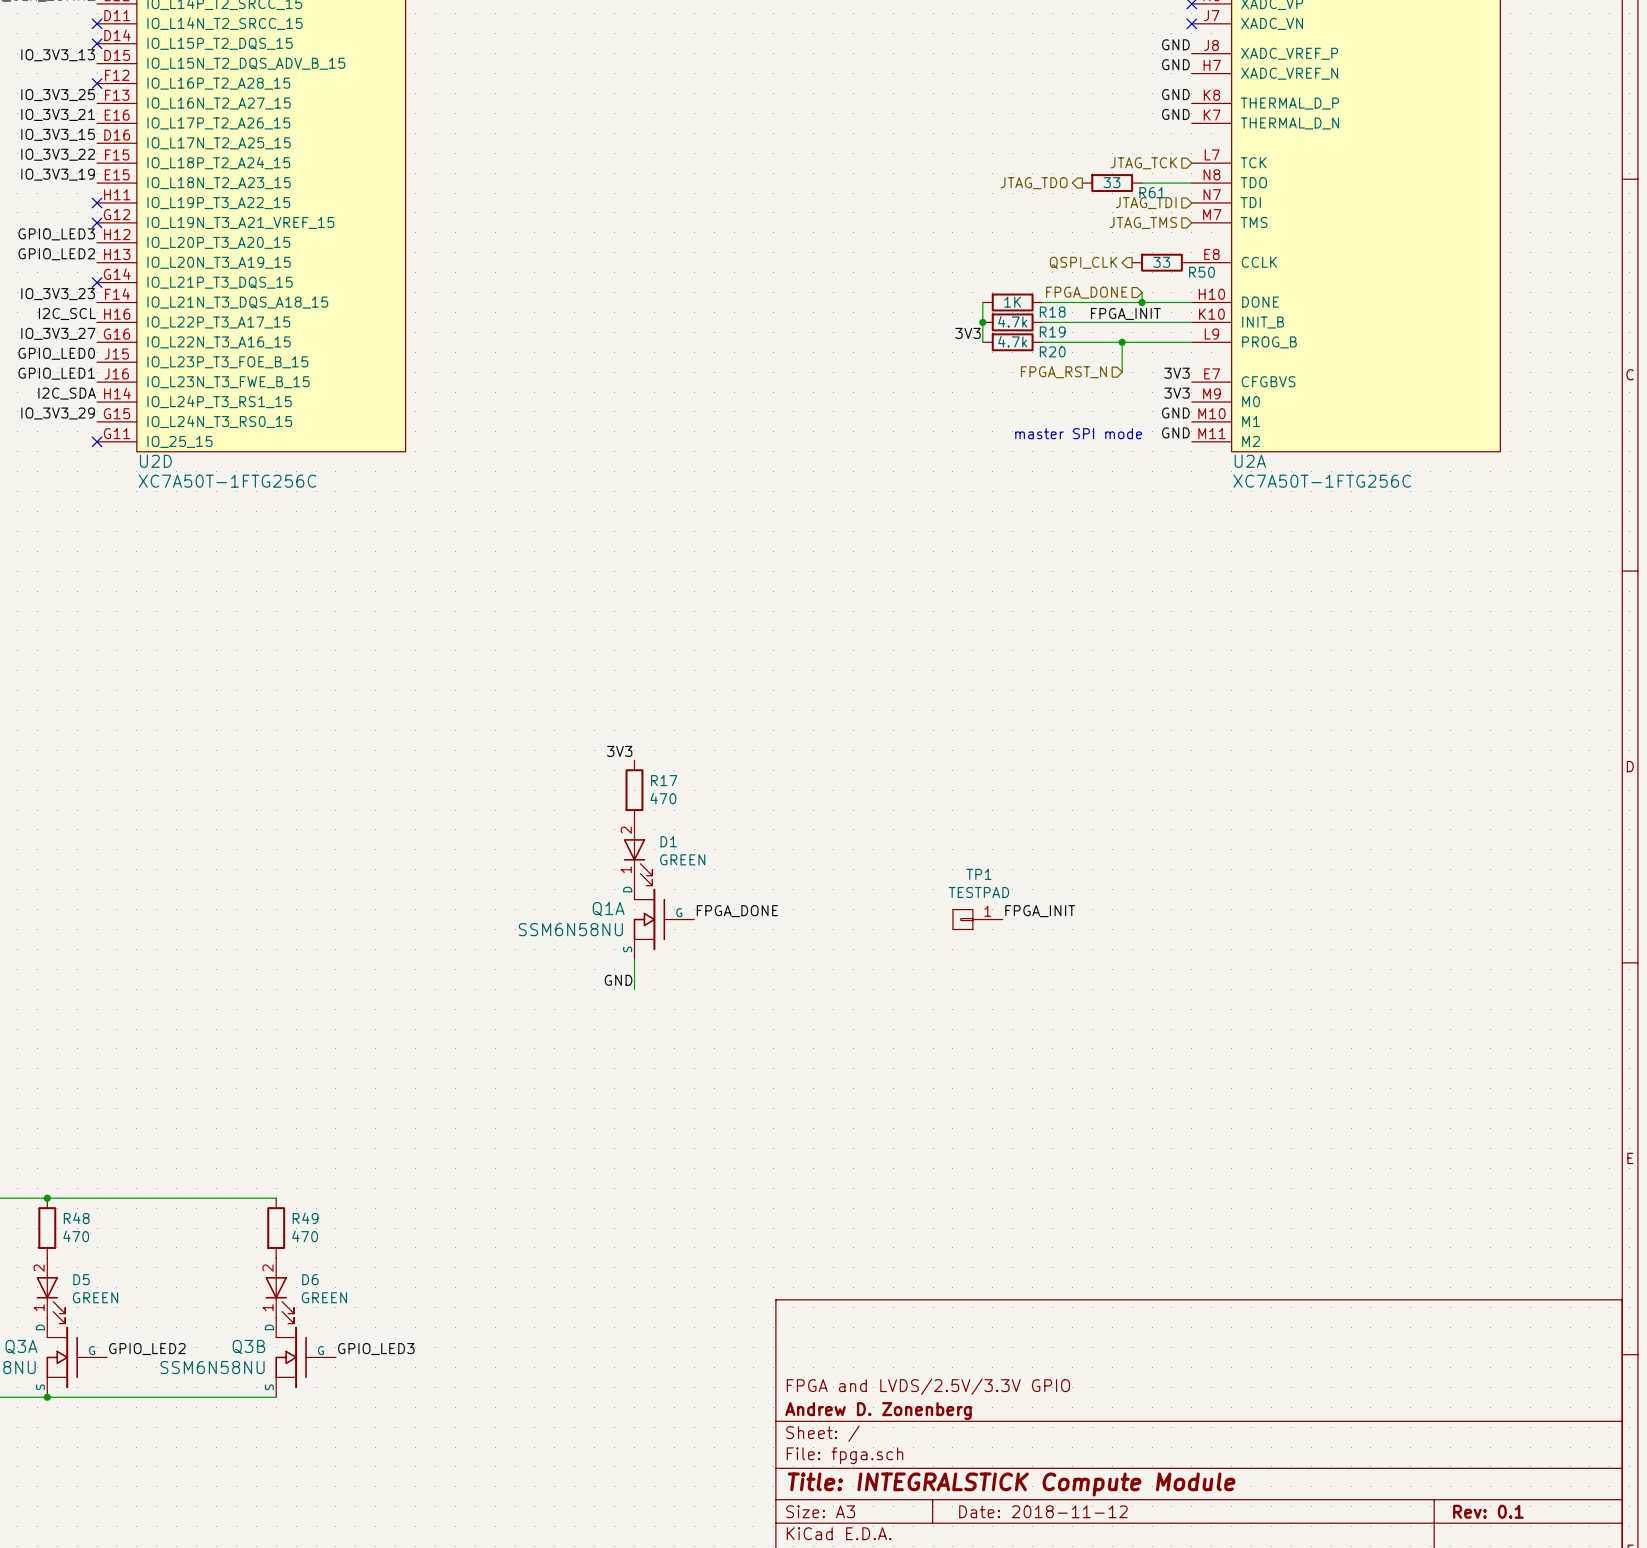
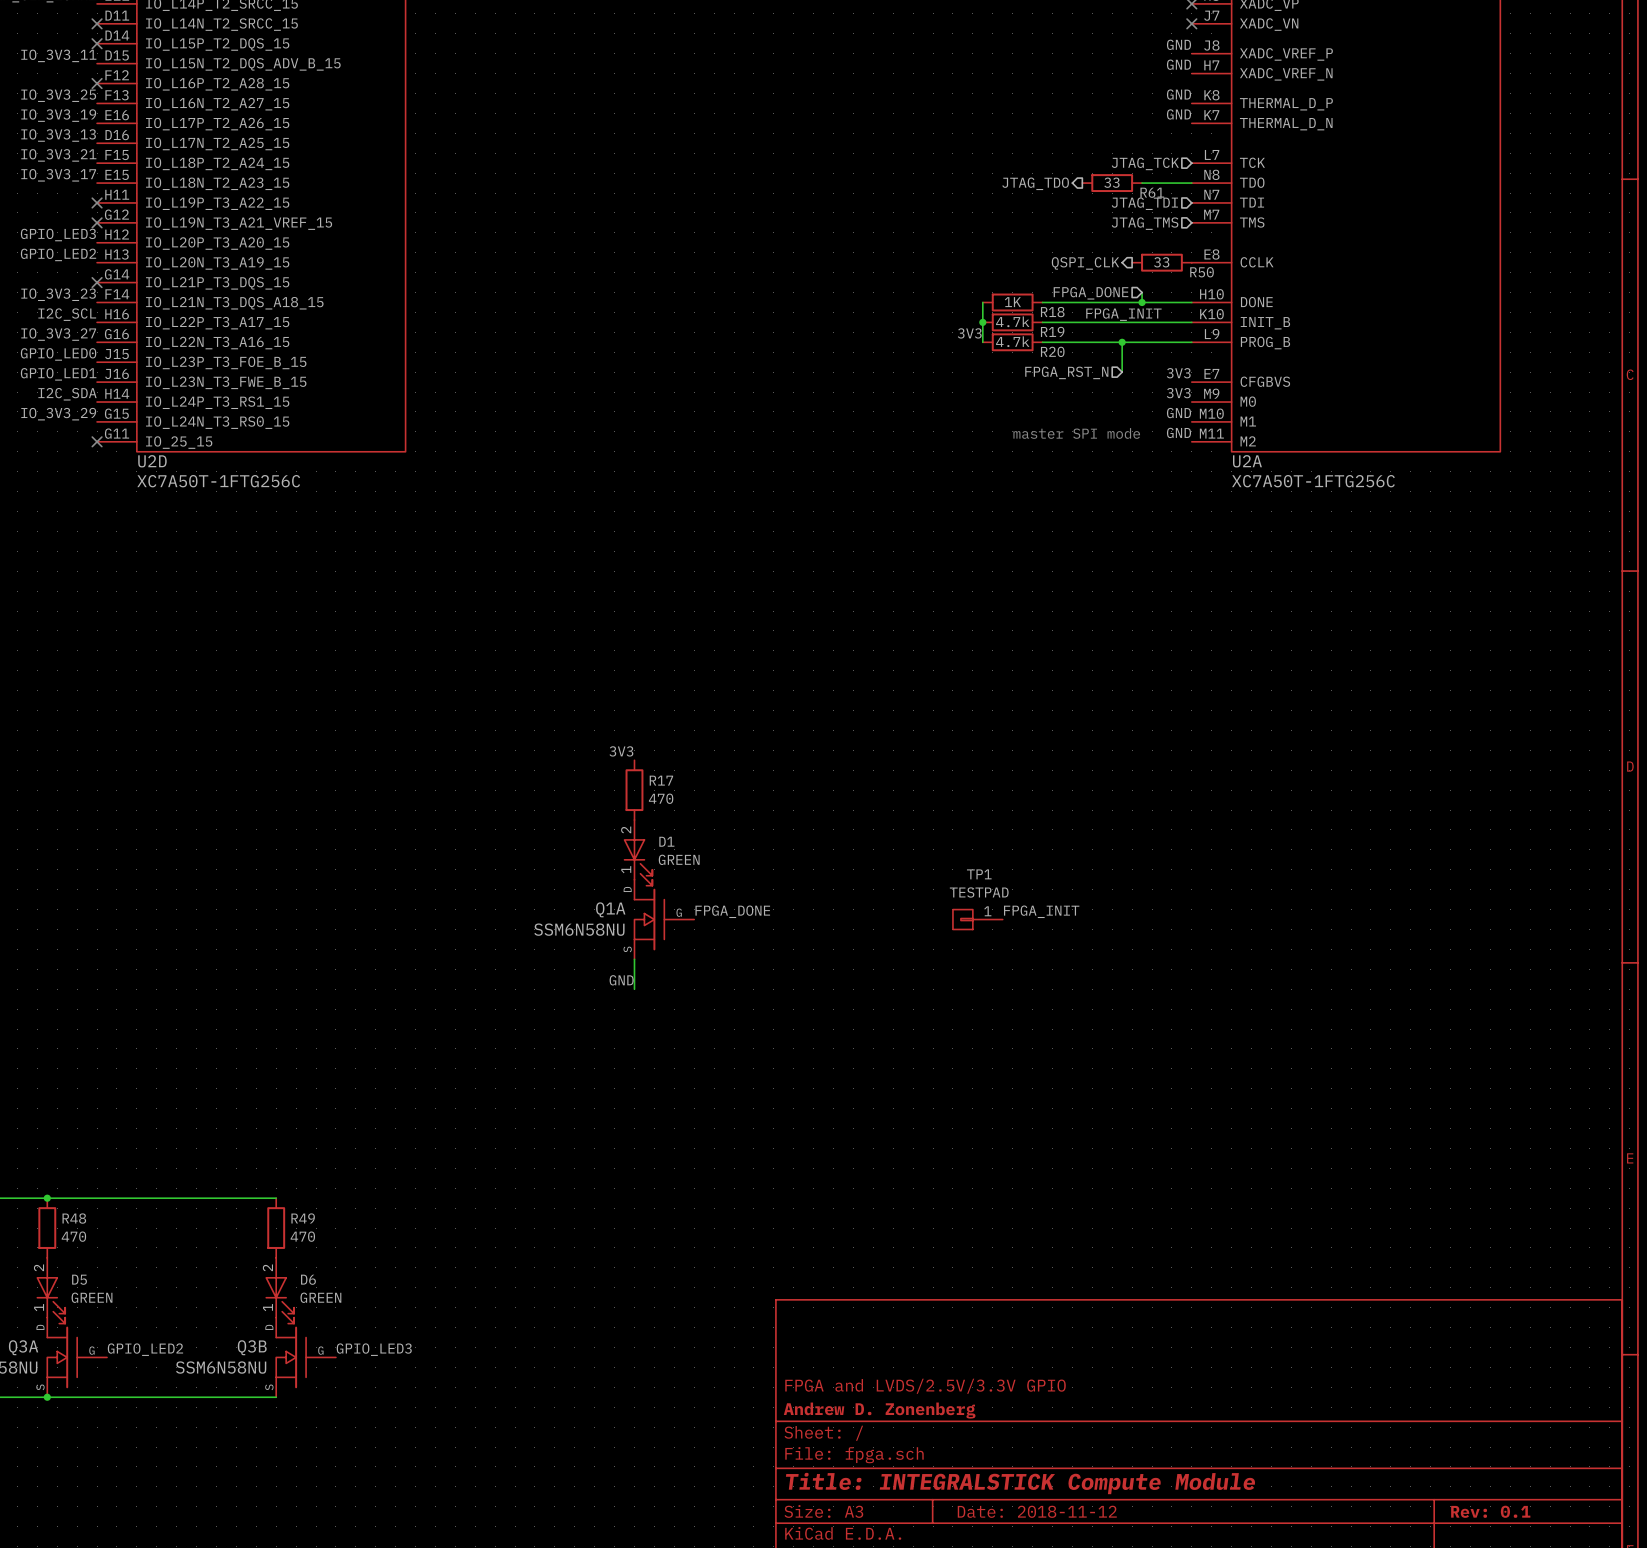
label: IO_3V3_13 (58, 55) -> IO_3V3_11 (58, 55)
label: IO_3V3_21 (58, 114) -> IO_3V3_19 (58, 115)
label: IO_3V3_15 (58, 134) -> IO_3V3_13 (58, 135)
label: IO_3V3_22 (58, 154) -> IO_3V3_21 (58, 155)
label: IO_3V3_19 (58, 174) -> IO_3V3_17 (58, 175)

